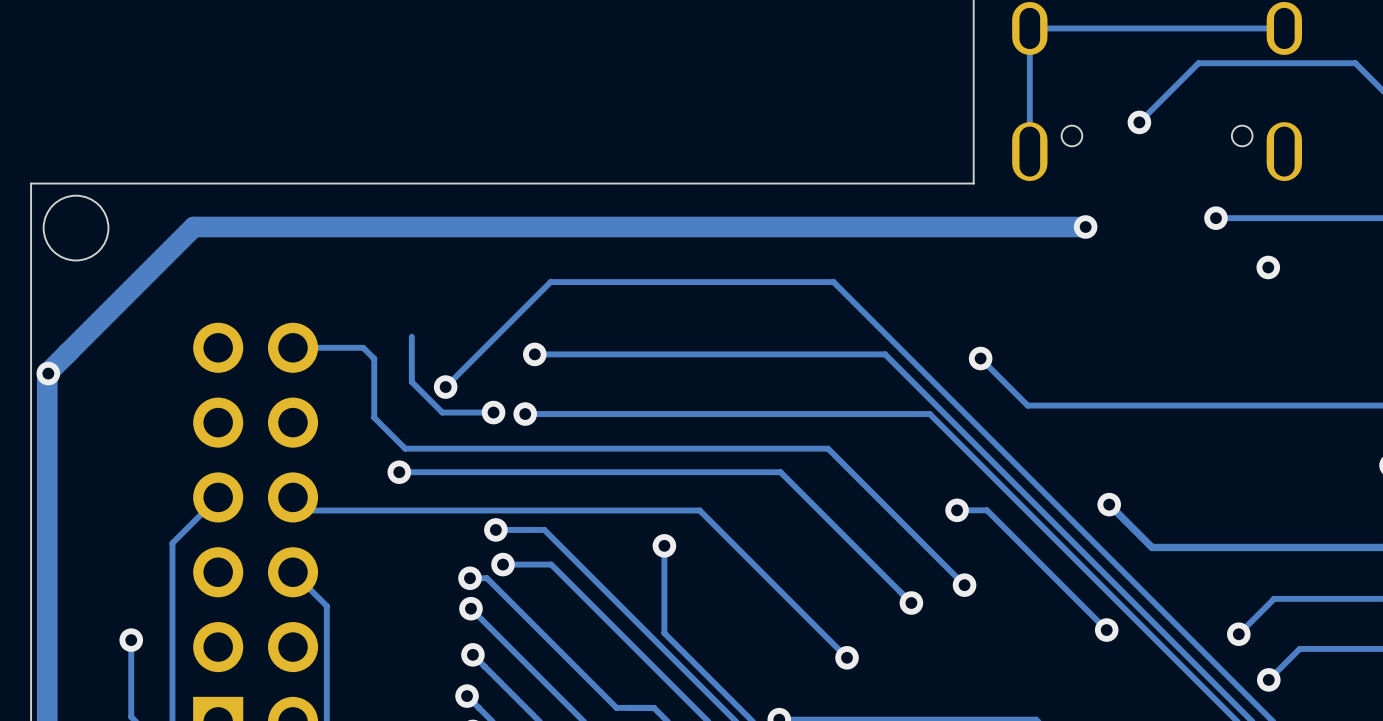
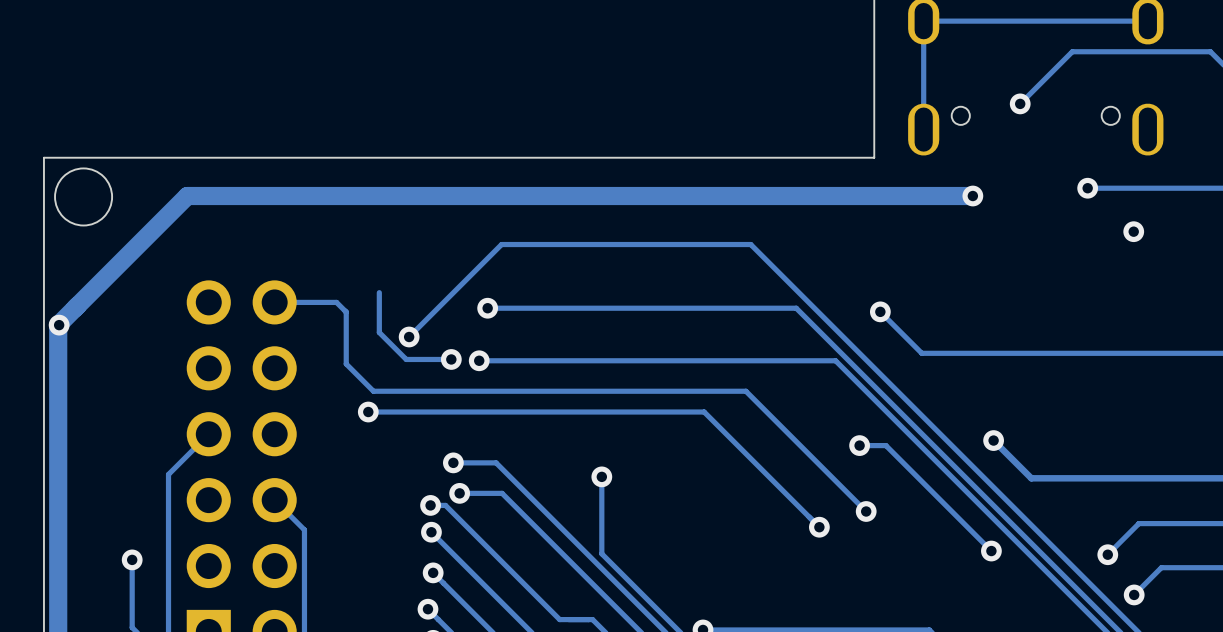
track: (306, 510) (699, 510) (847, 657) -> none
via: (847, 657) -> none

